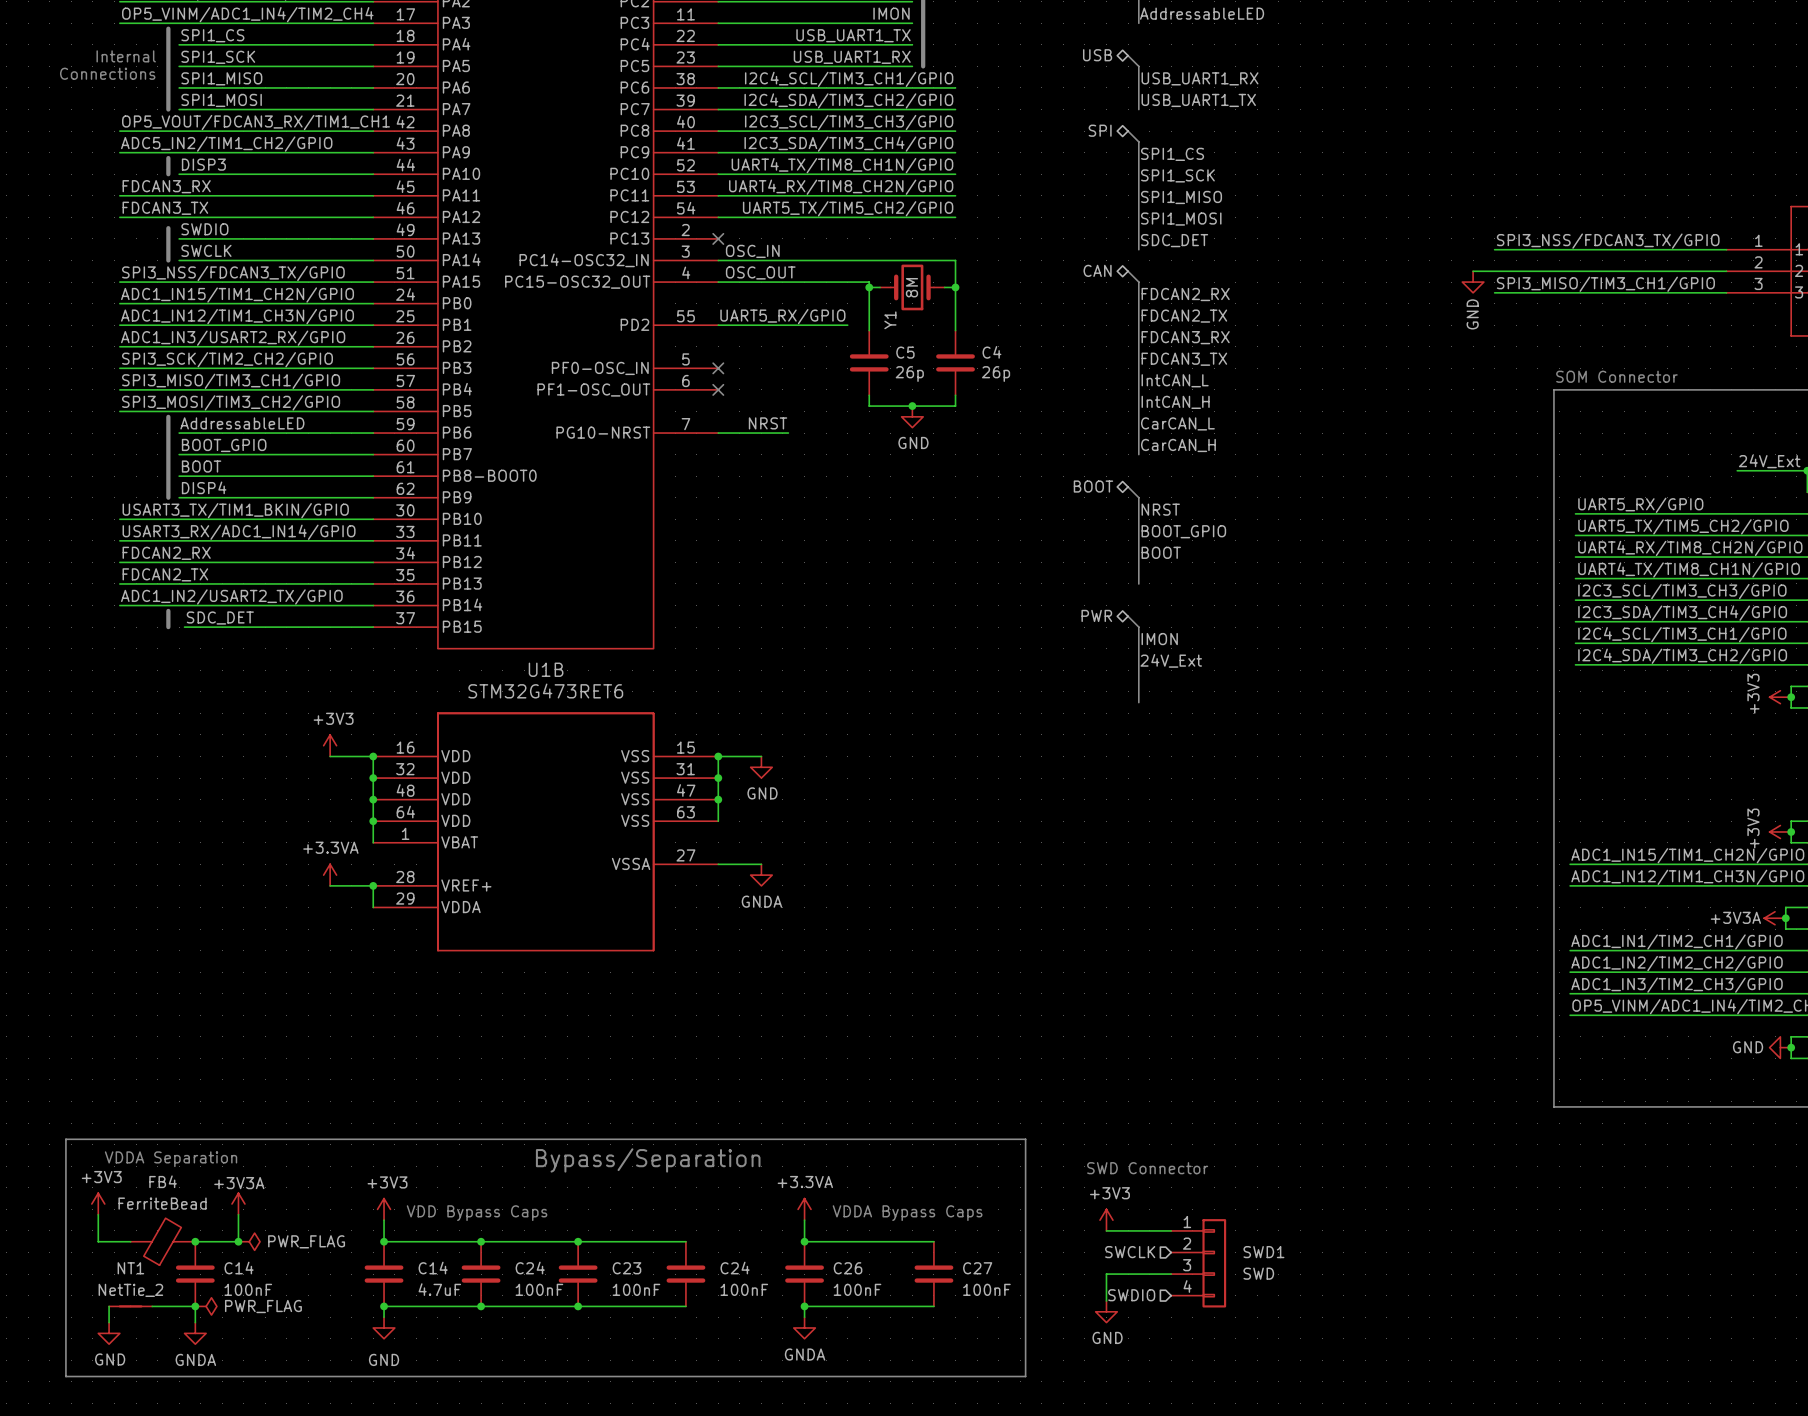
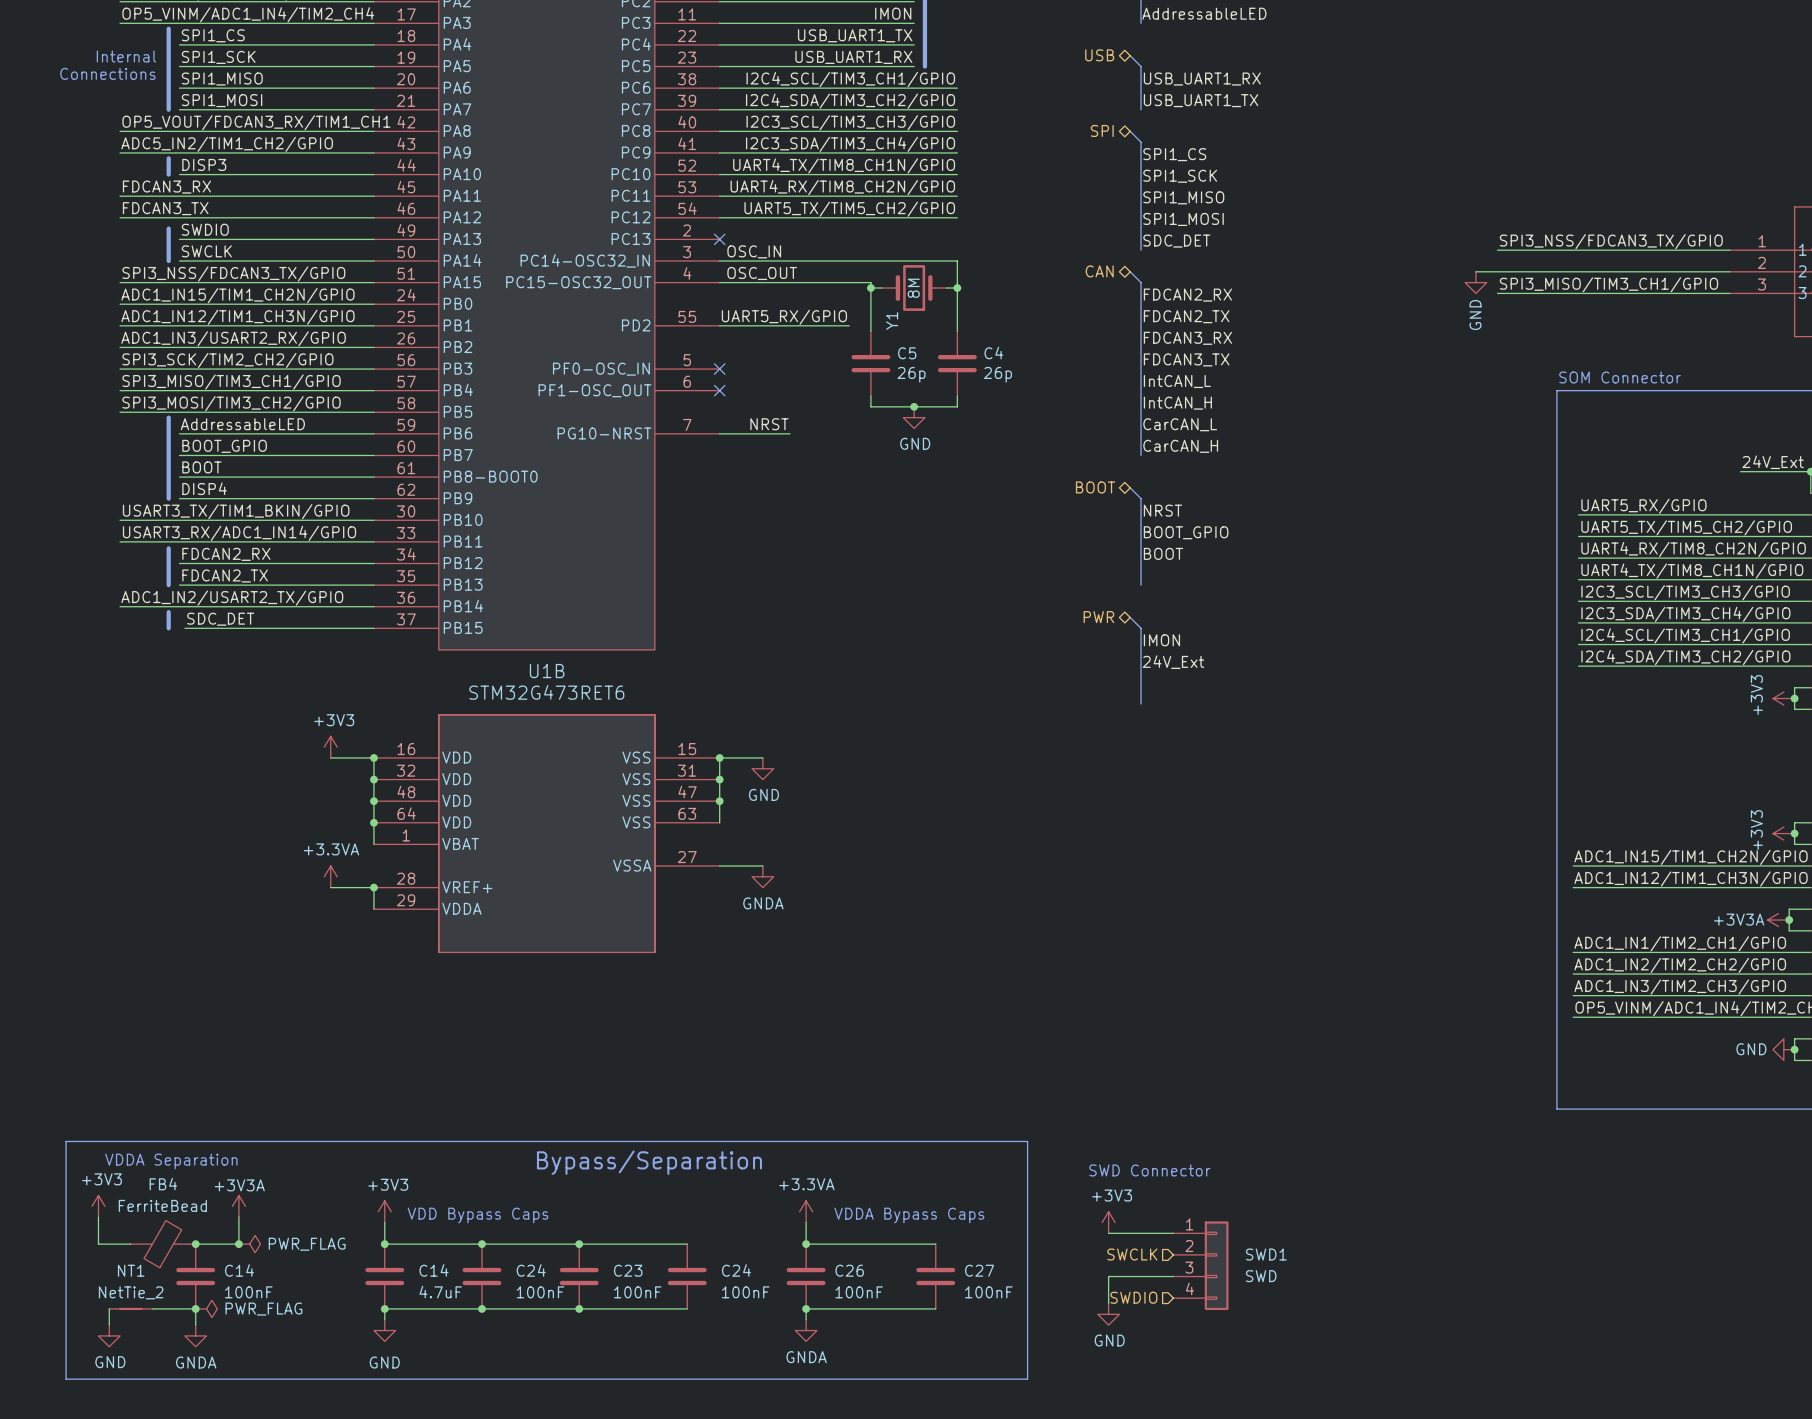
line: none -> (168, 548) (168, 585)
label position: FDCAN2_RX (166, 553) -> FDCAN2_RX (226, 554)
wire: (119, 562) (179, 562) -> none
label position: FDCAN2_TX (165, 574) -> FDCAN2_TX (225, 575)
wire: (119, 583) (179, 583) -> none

